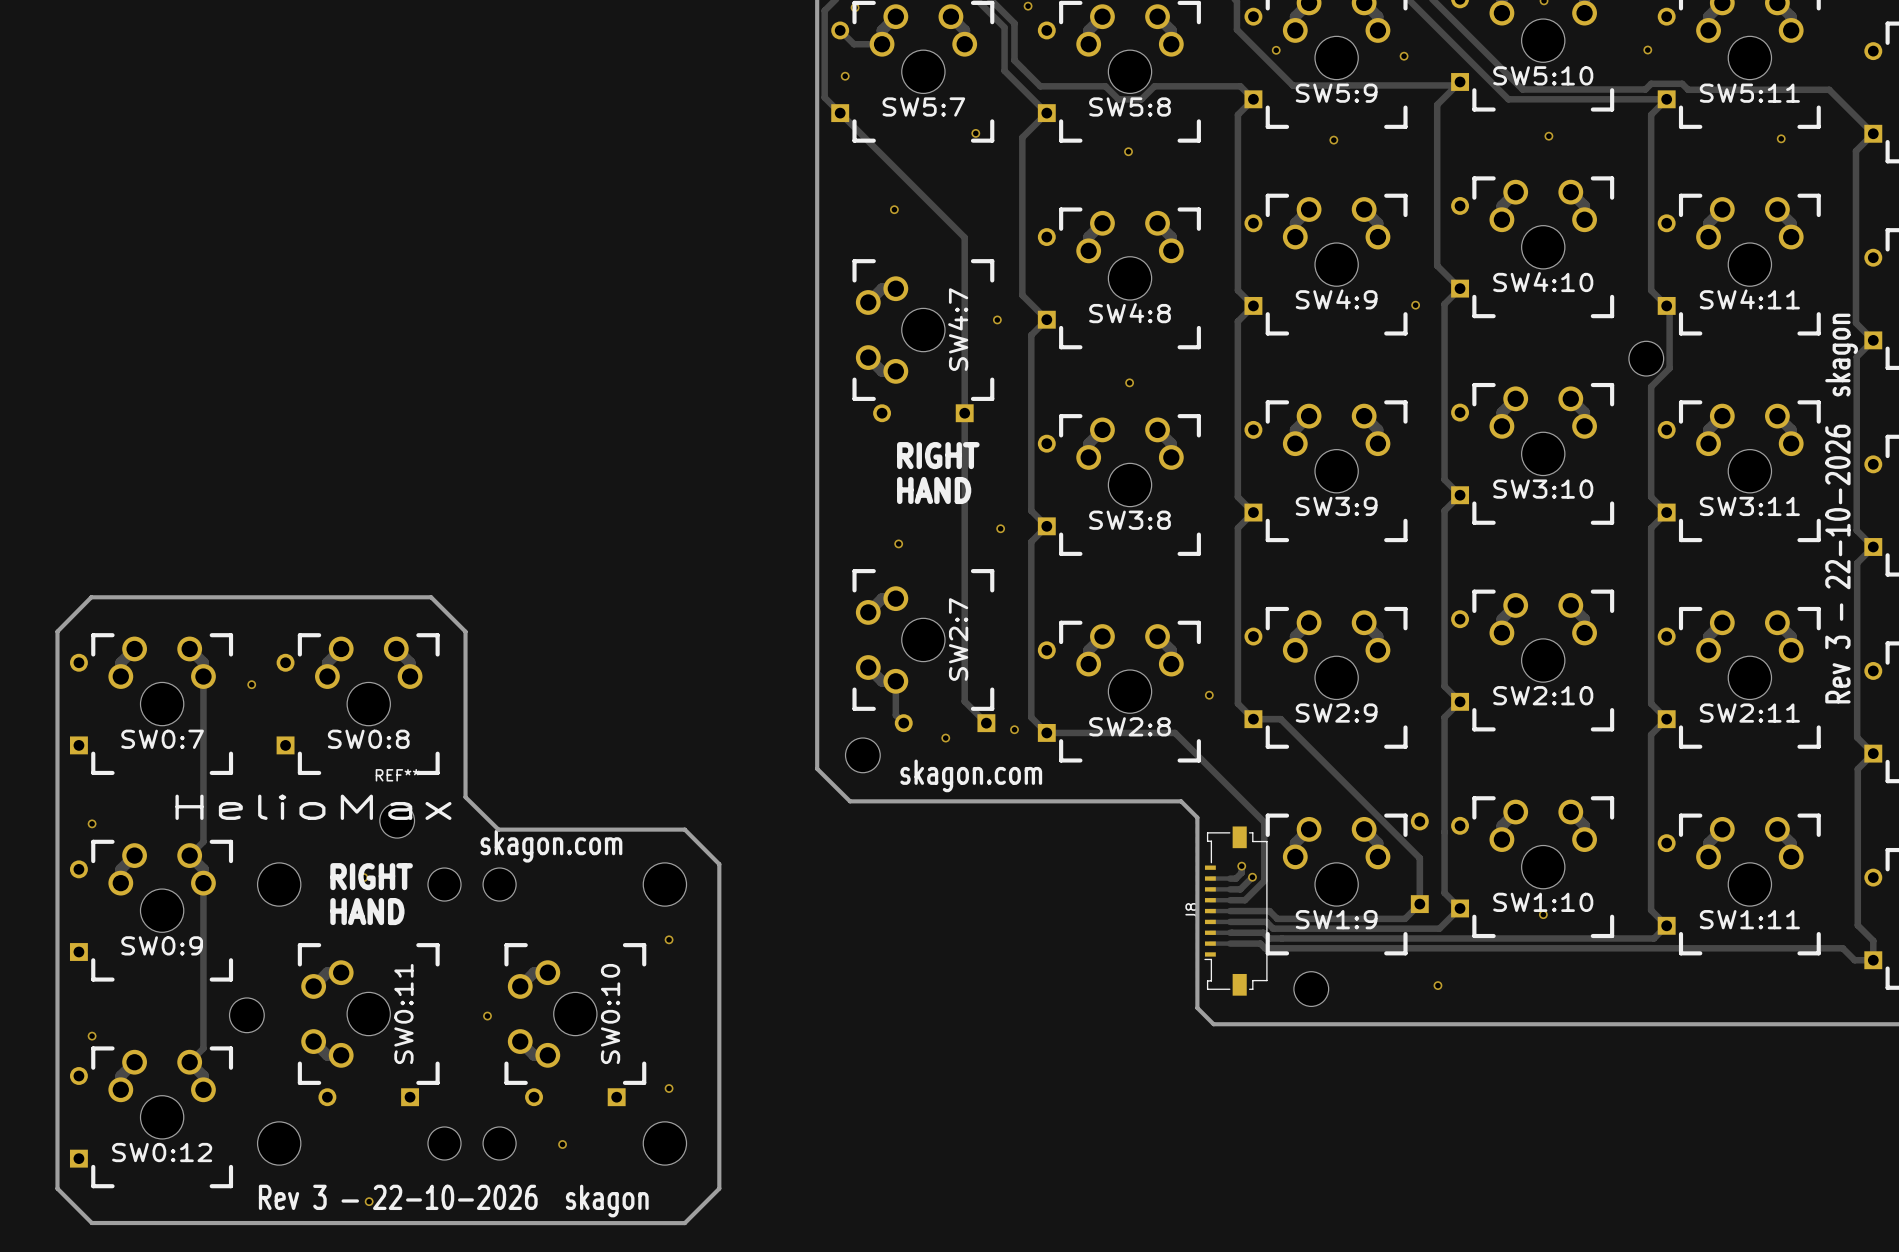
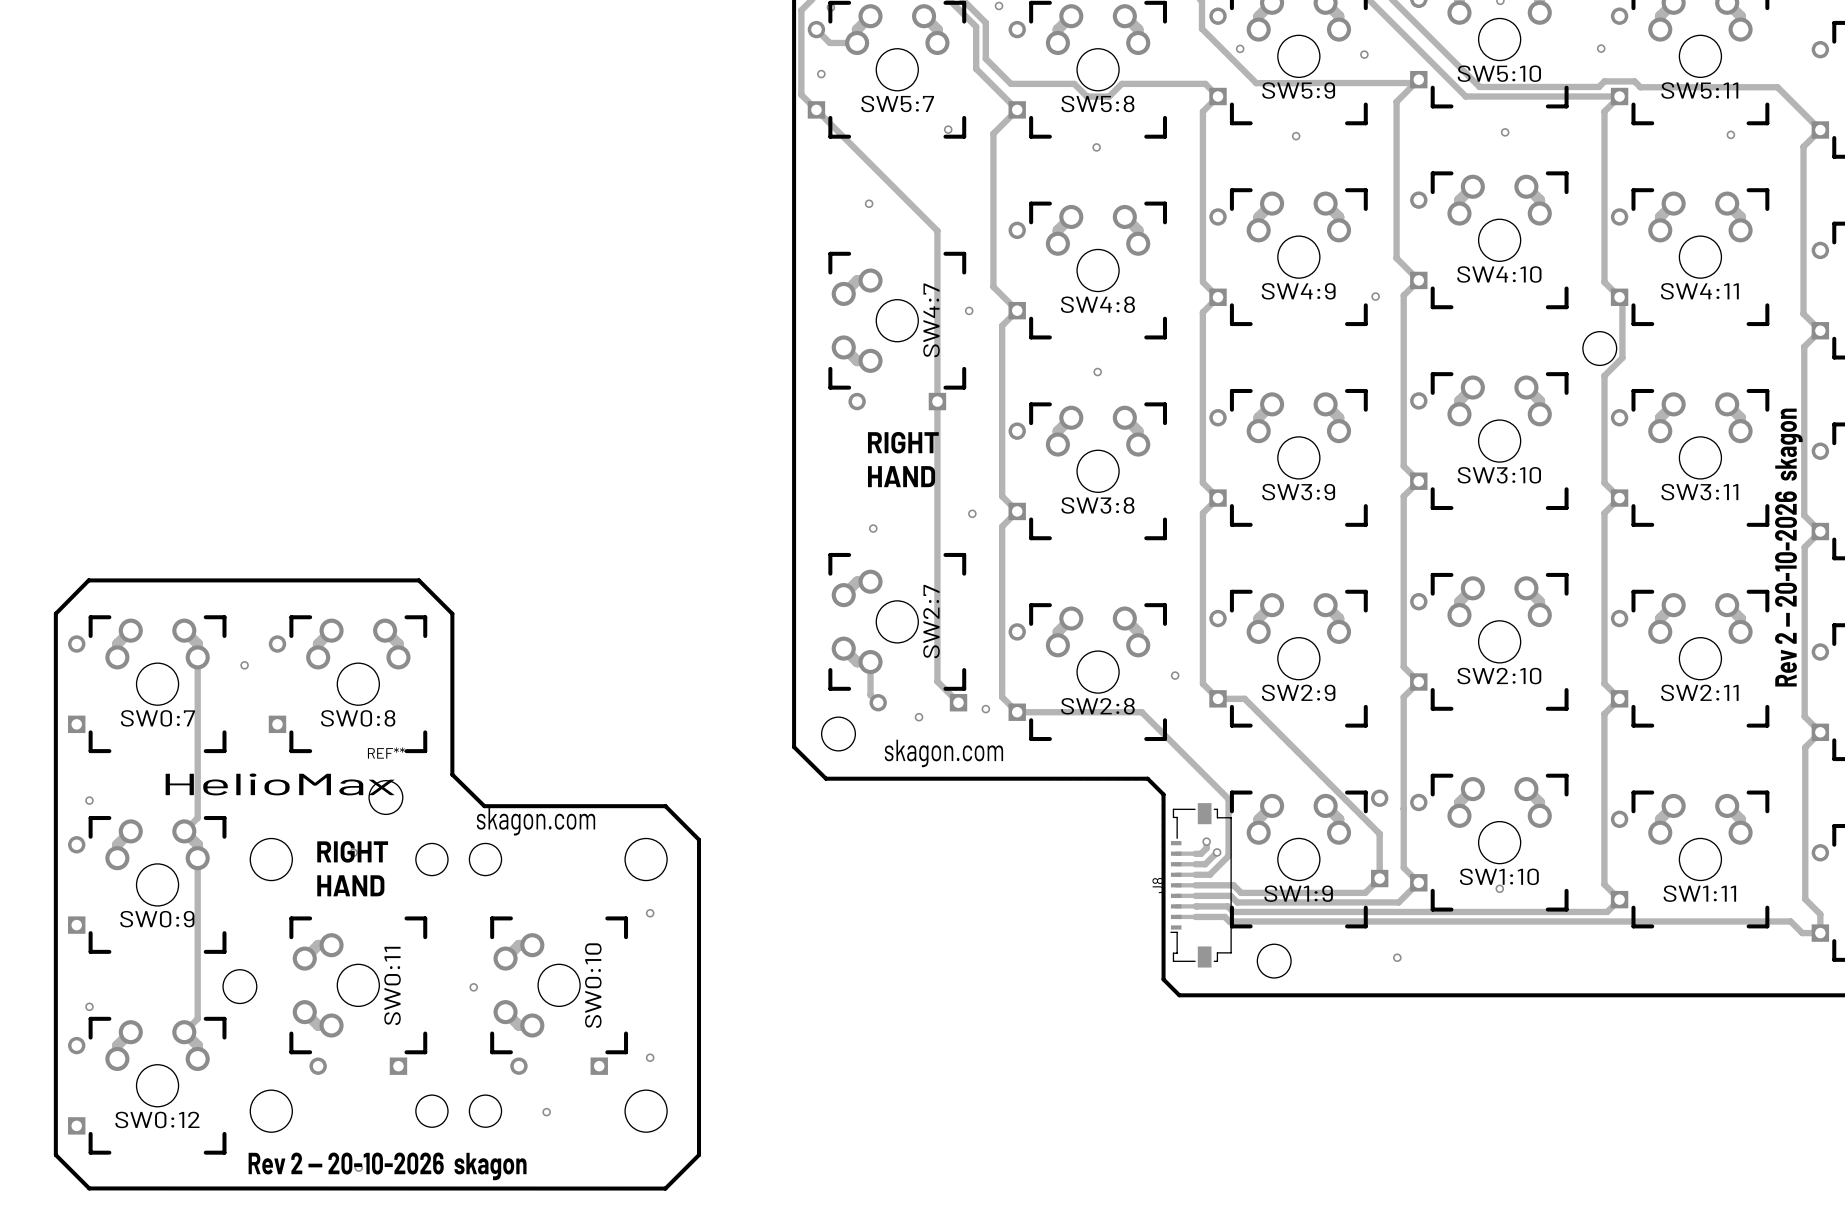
text: Rev 3 — 22-10-2026 skagon (1841, 508) -> Rev 2 — 20-10-2026 skagon (1788, 547)
text: Rev 3 — 22-10-2026 skagon (453, 1201) -> Rev 2 — 20-10-2026 skagon (387, 1166)

